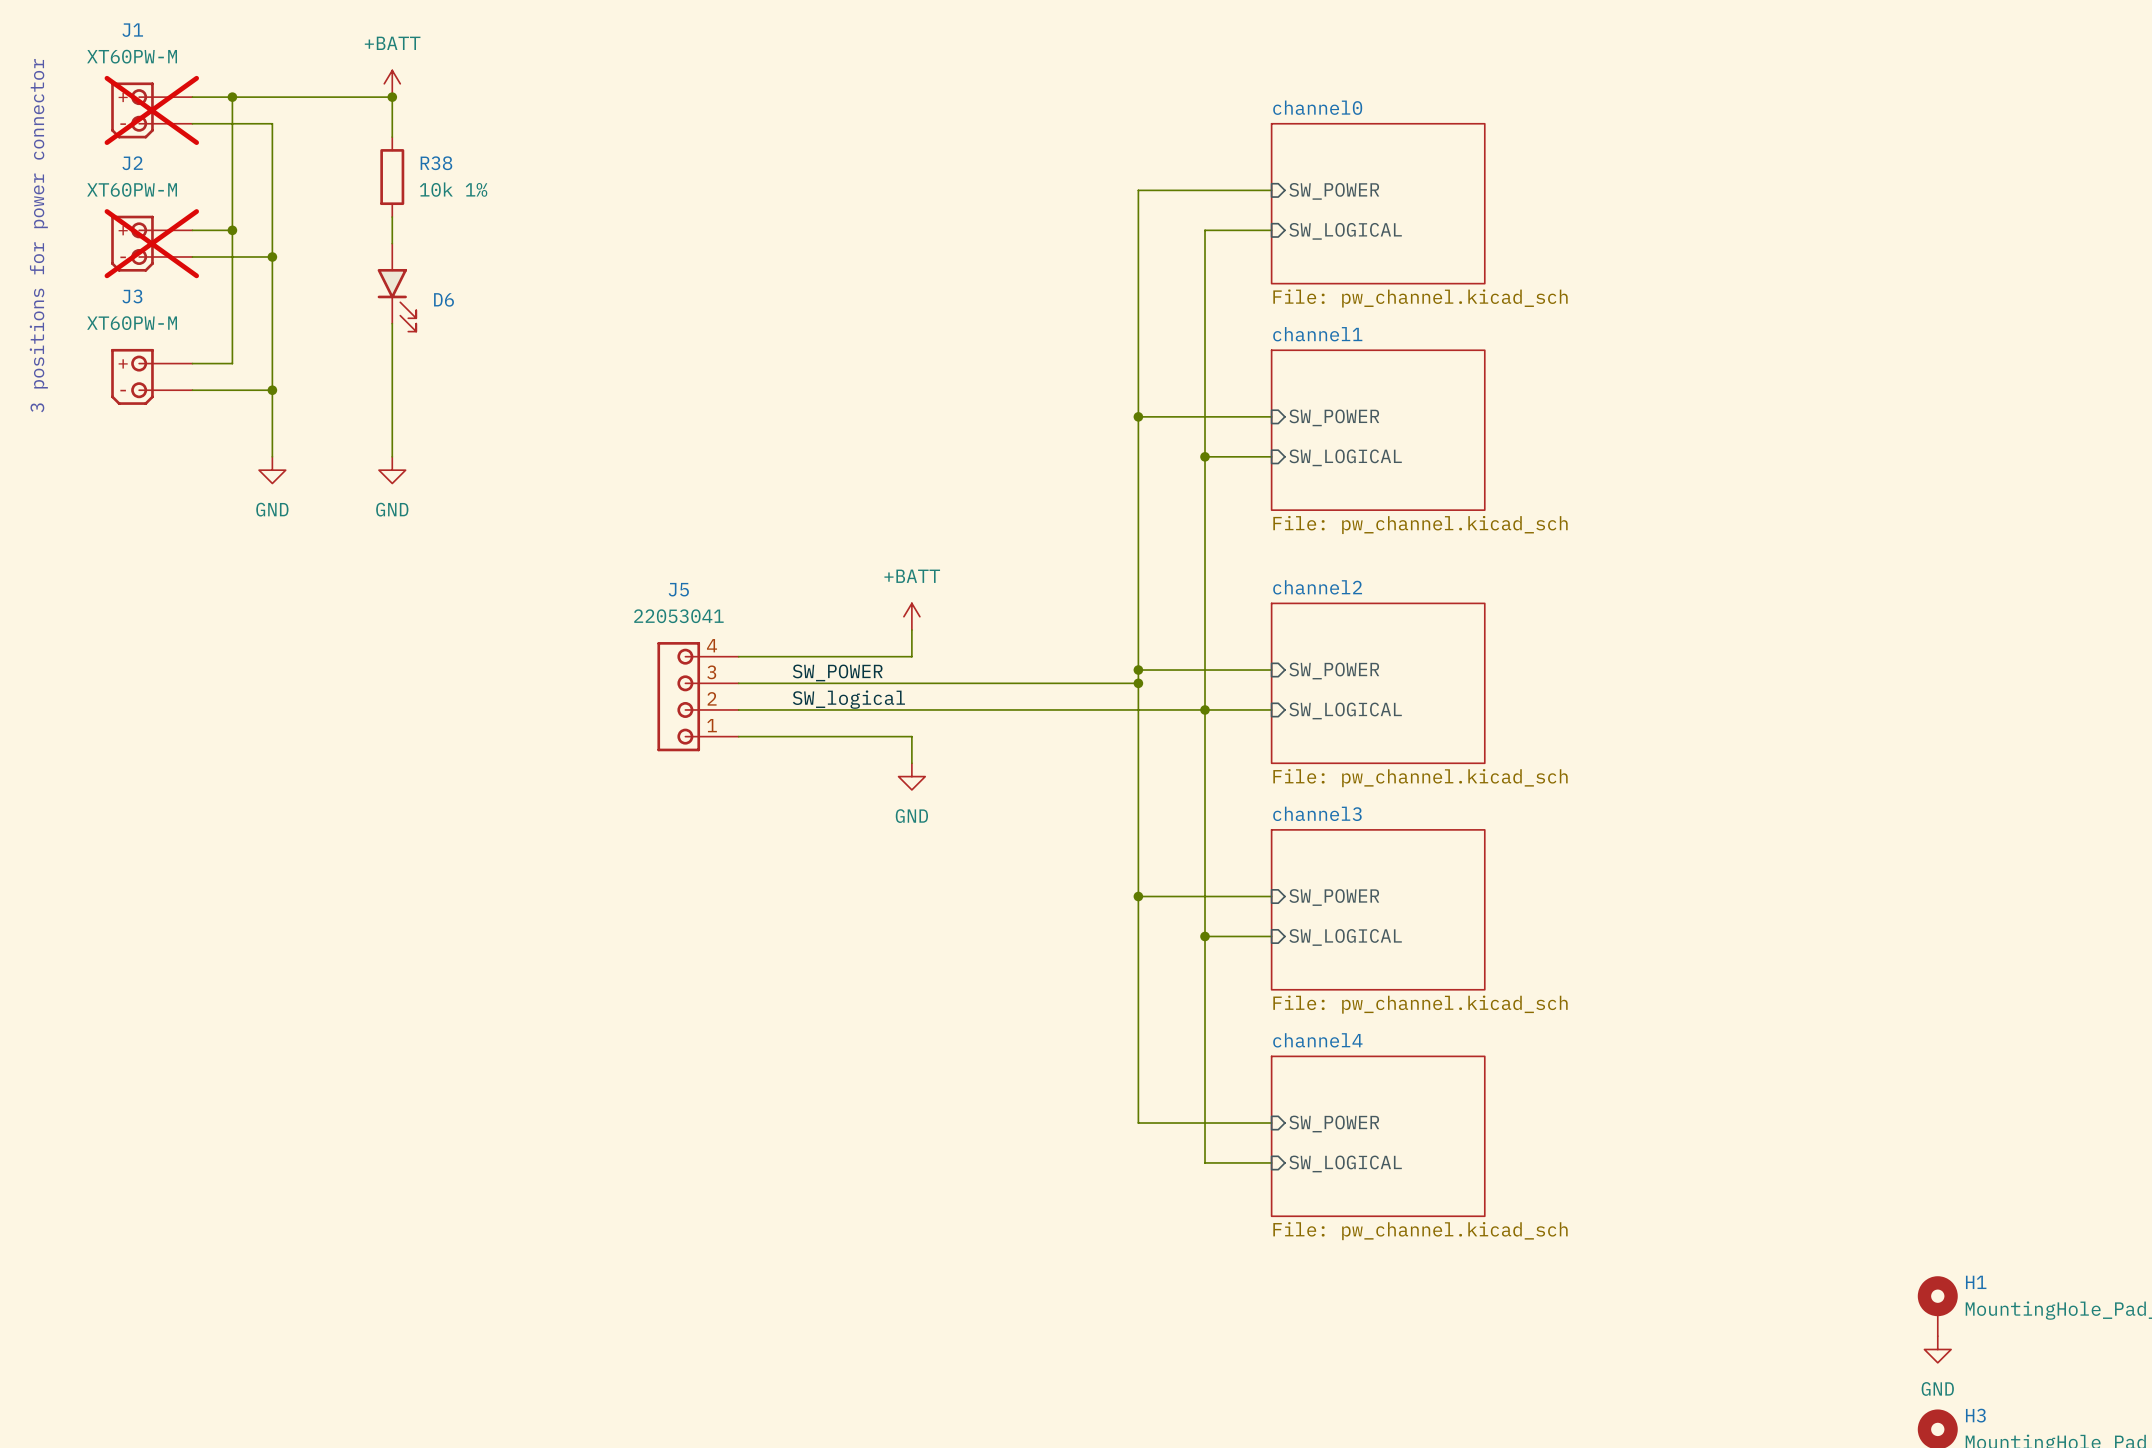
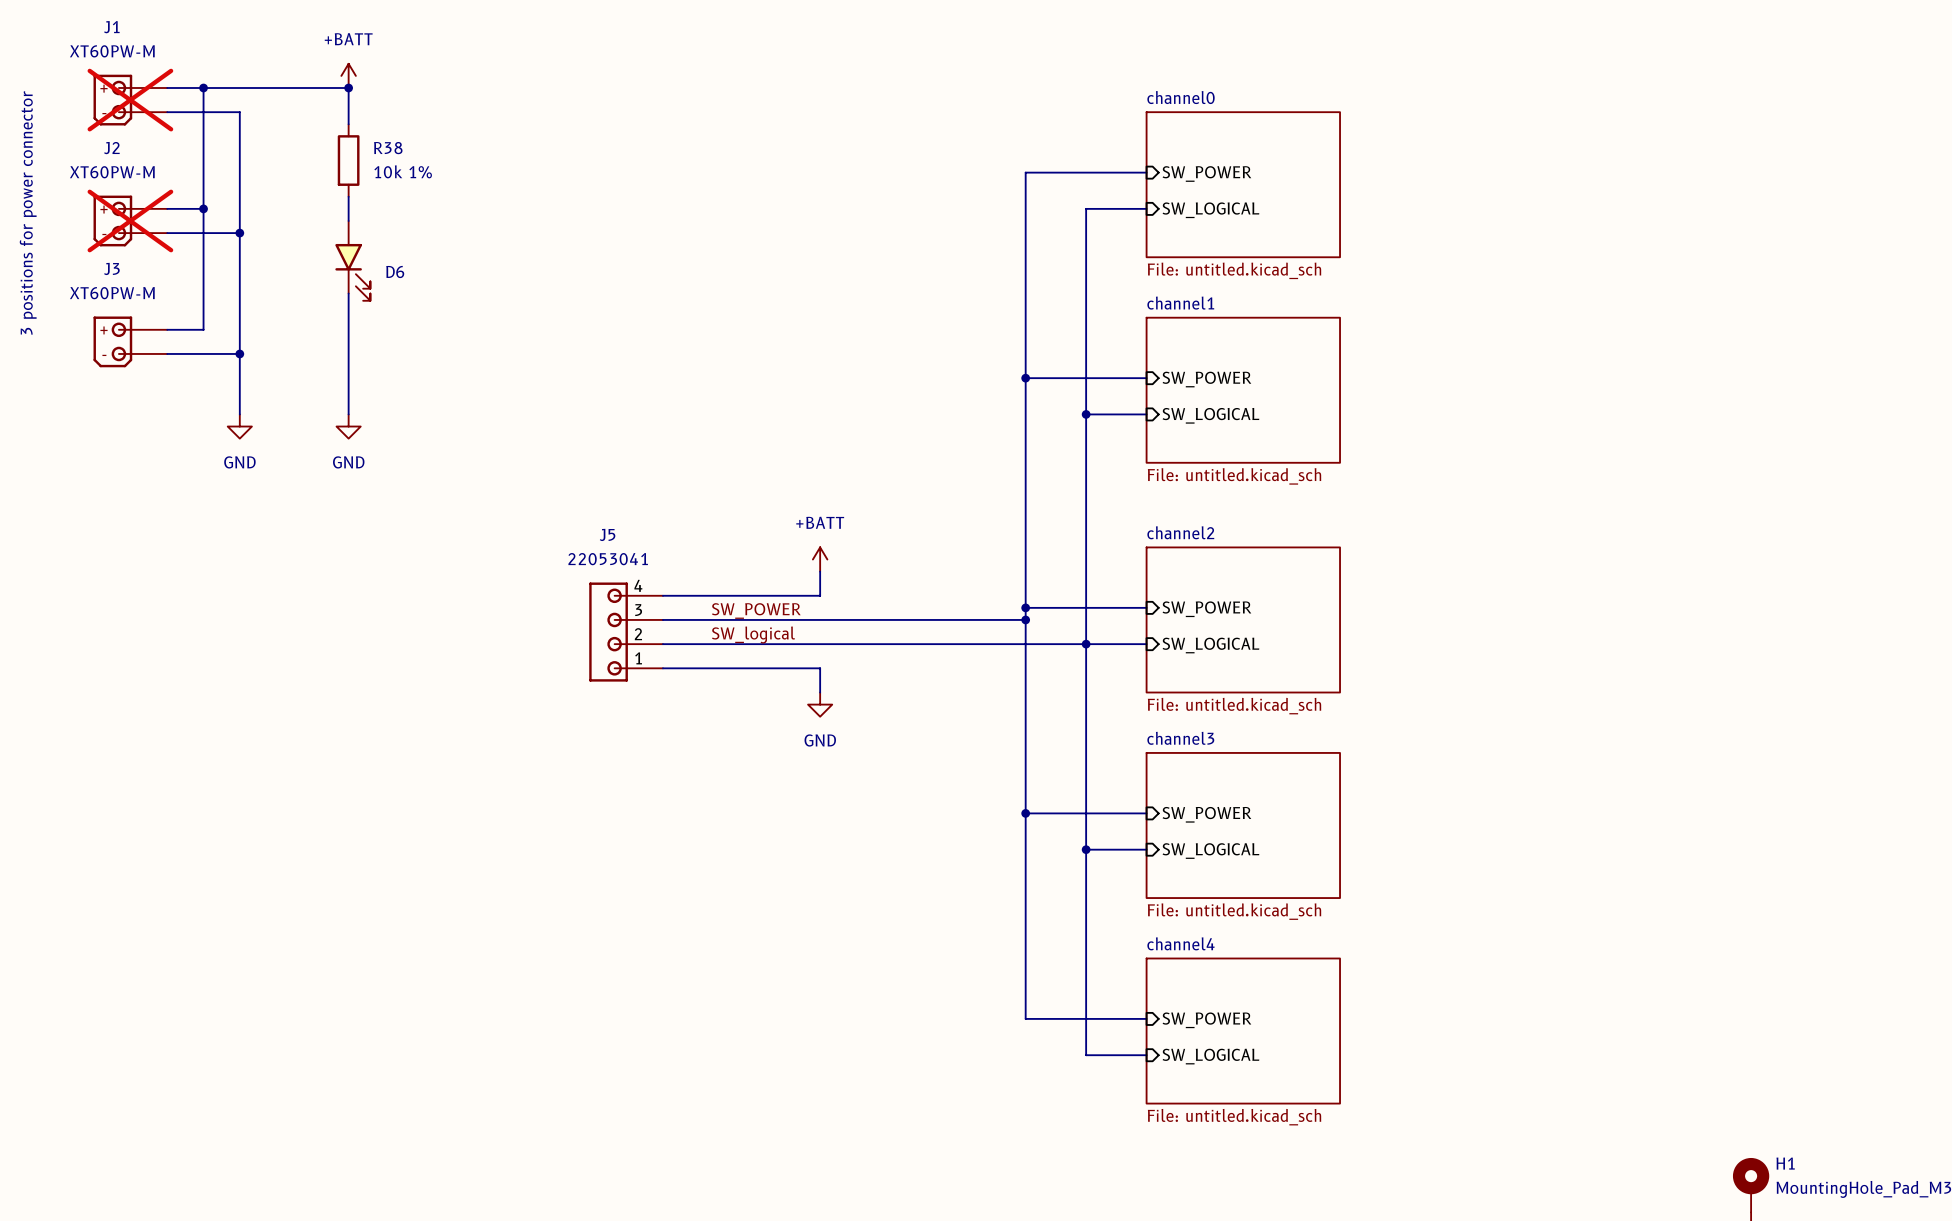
sheet channel0 value: File: pw_channel.kicad_sch (1420, 298) -> File: untitled.kicad_sch (1234, 270)
sheet channel1 value: File: pw_channel.kicad_sch (1420, 524) -> File: untitled.kicad_sch (1234, 476)
sheet channel2 value: File: pw_channel.kicad_sch (1420, 778) -> File: untitled.kicad_sch (1234, 706)
sheet channel3 value: File: pw_channel.kicad_sch (1420, 1004) -> File: untitled.kicad_sch (1234, 911)
sheet channel4 value: File: pw_channel.kicad_sch (1420, 1231) -> File: untitled.kicad_sch (1234, 1117)

